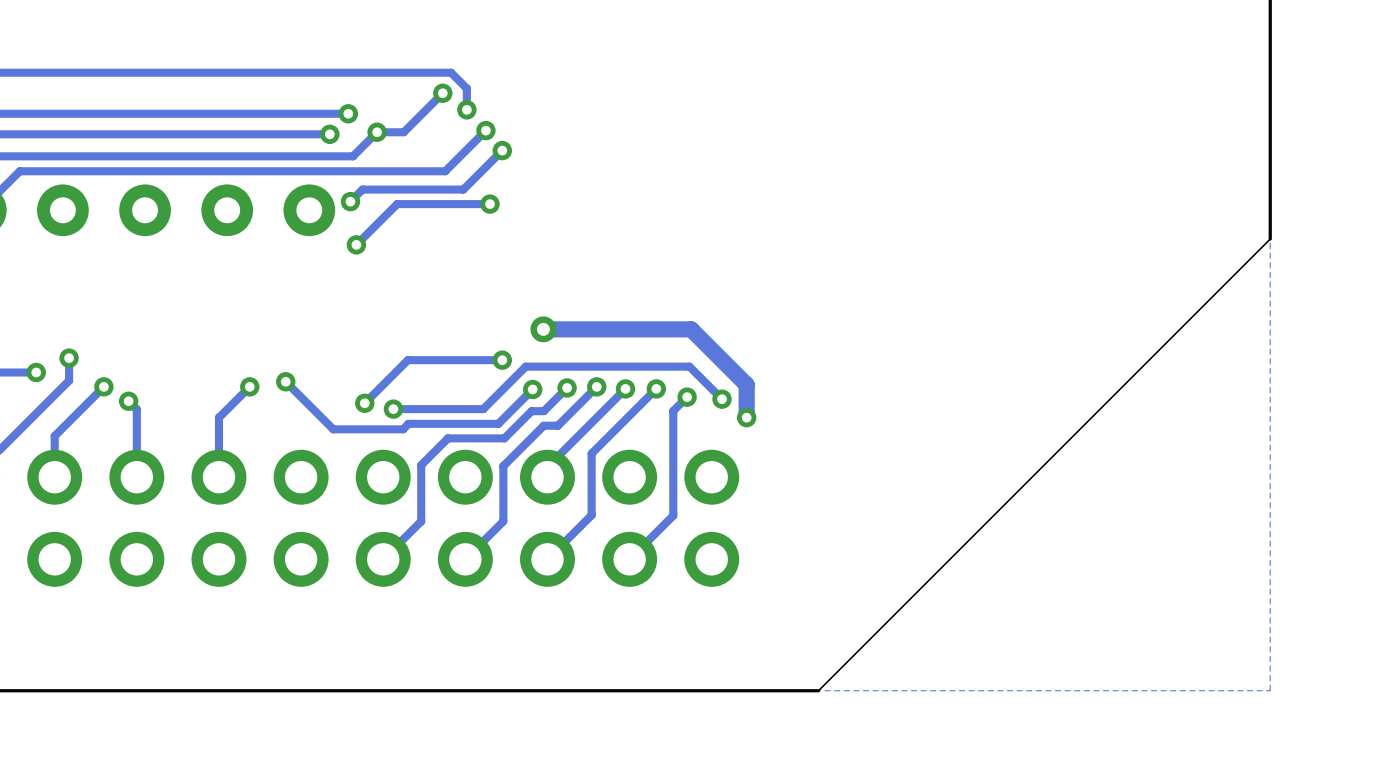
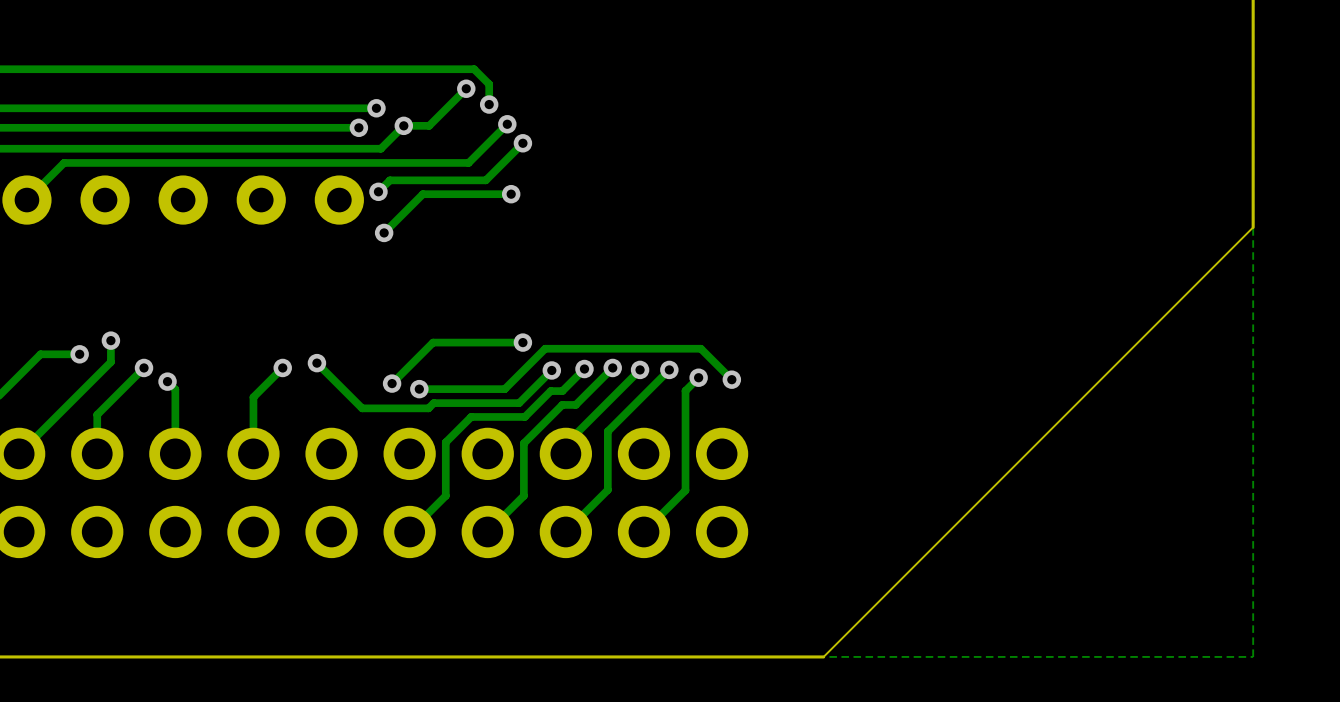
track: (543, 329) (691, 329) (746, 384) (746, 417) -> none
via: (543, 329) -> none
via: (746, 417) -> none

